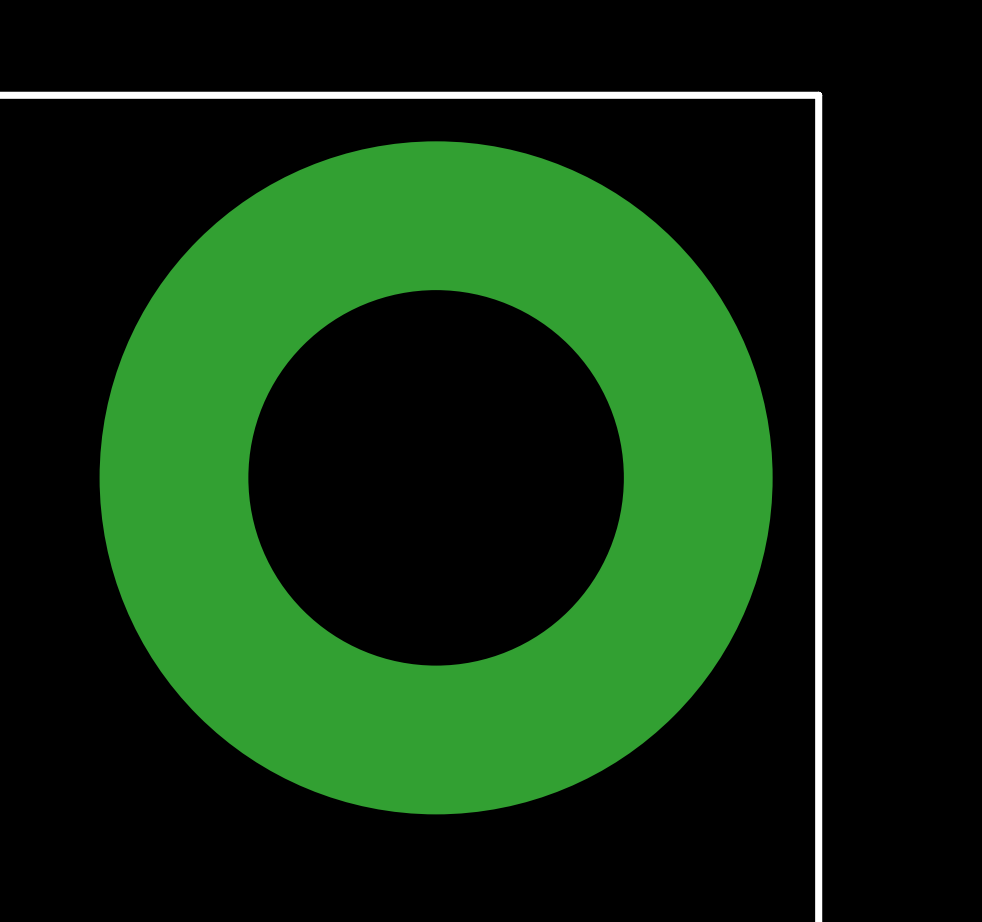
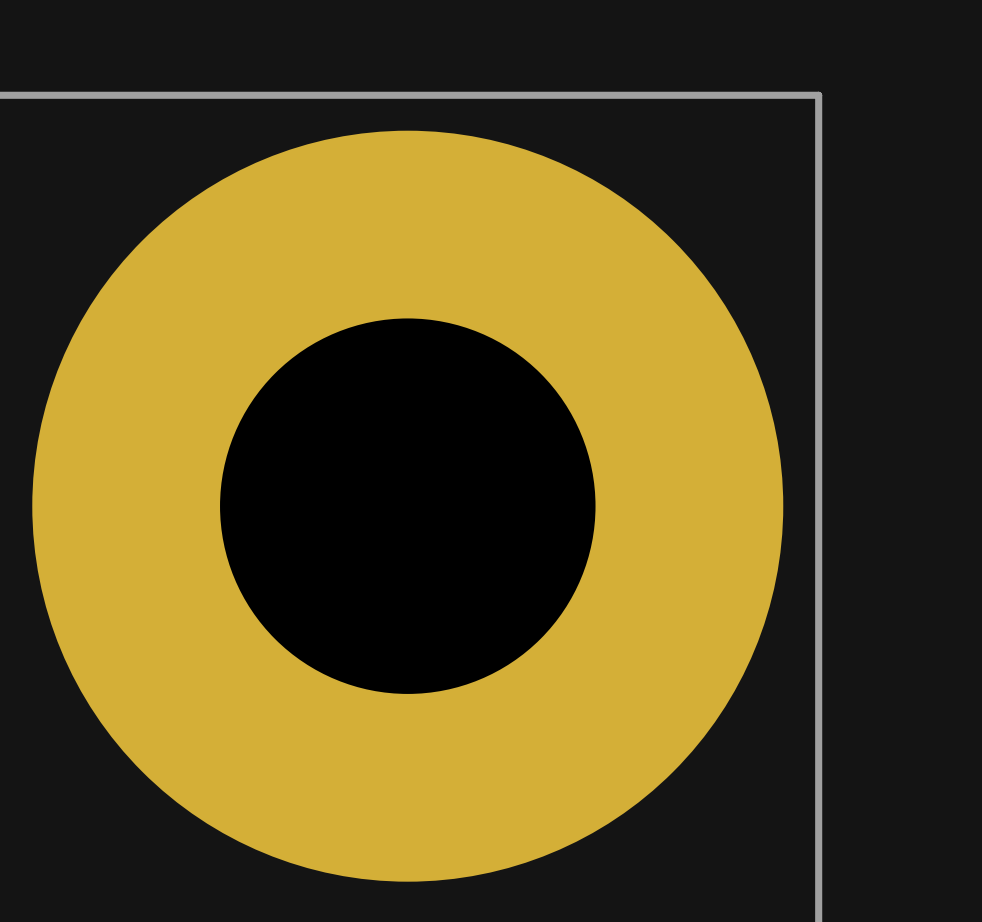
part footprint: [99, 141, 773, 815] -> [32, 130, 784, 882]

